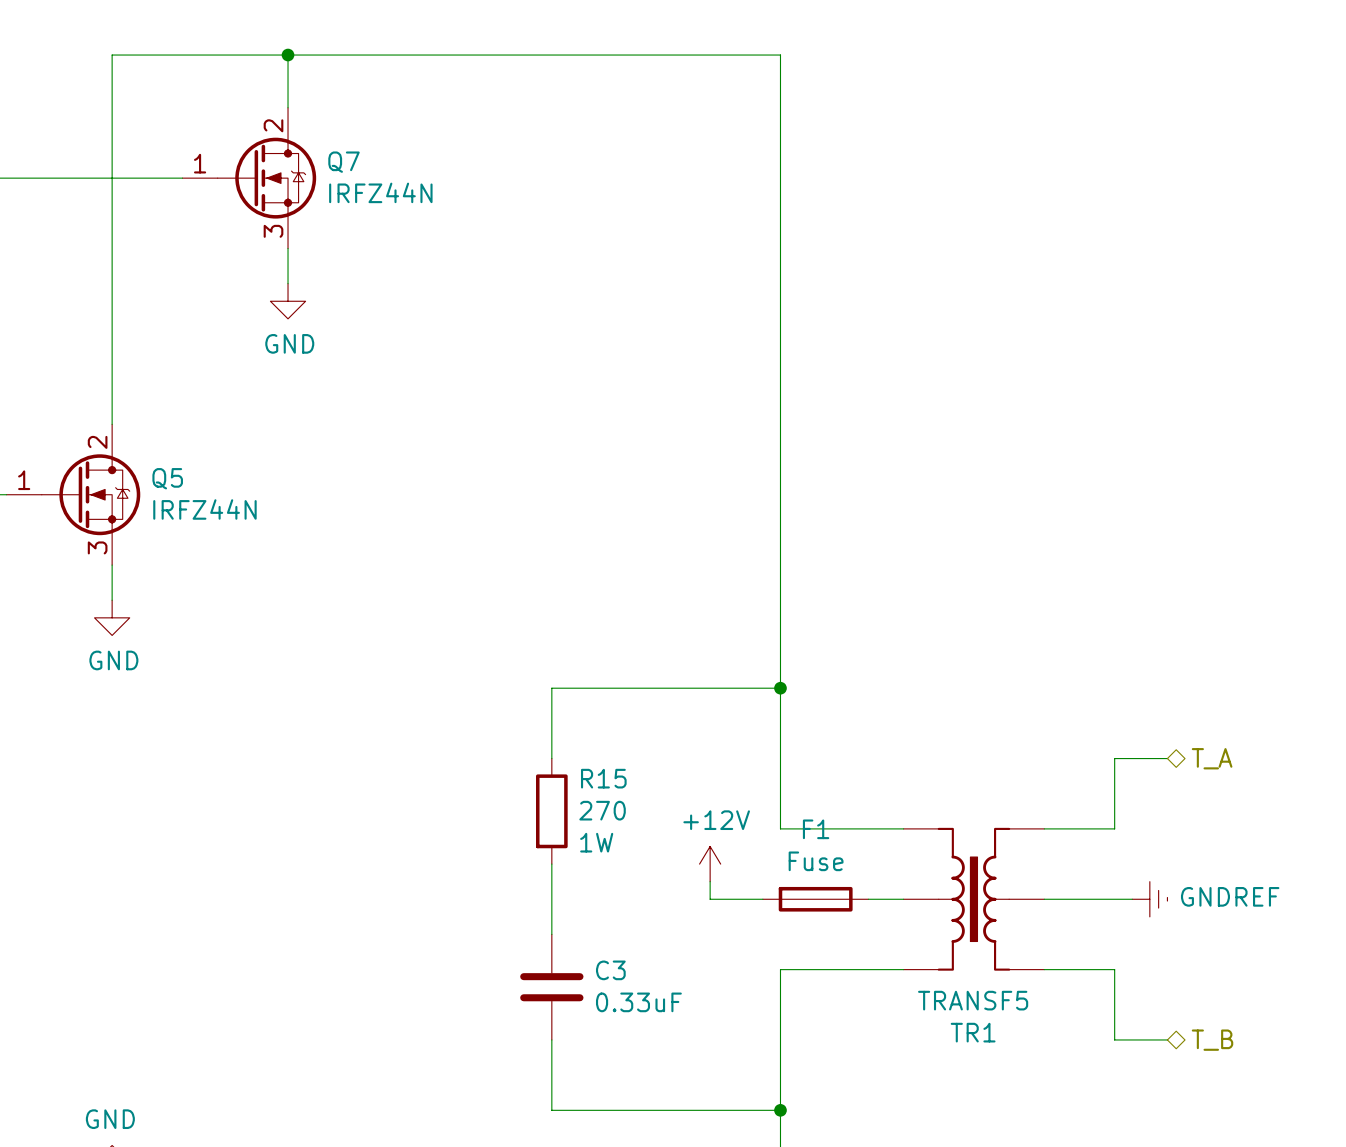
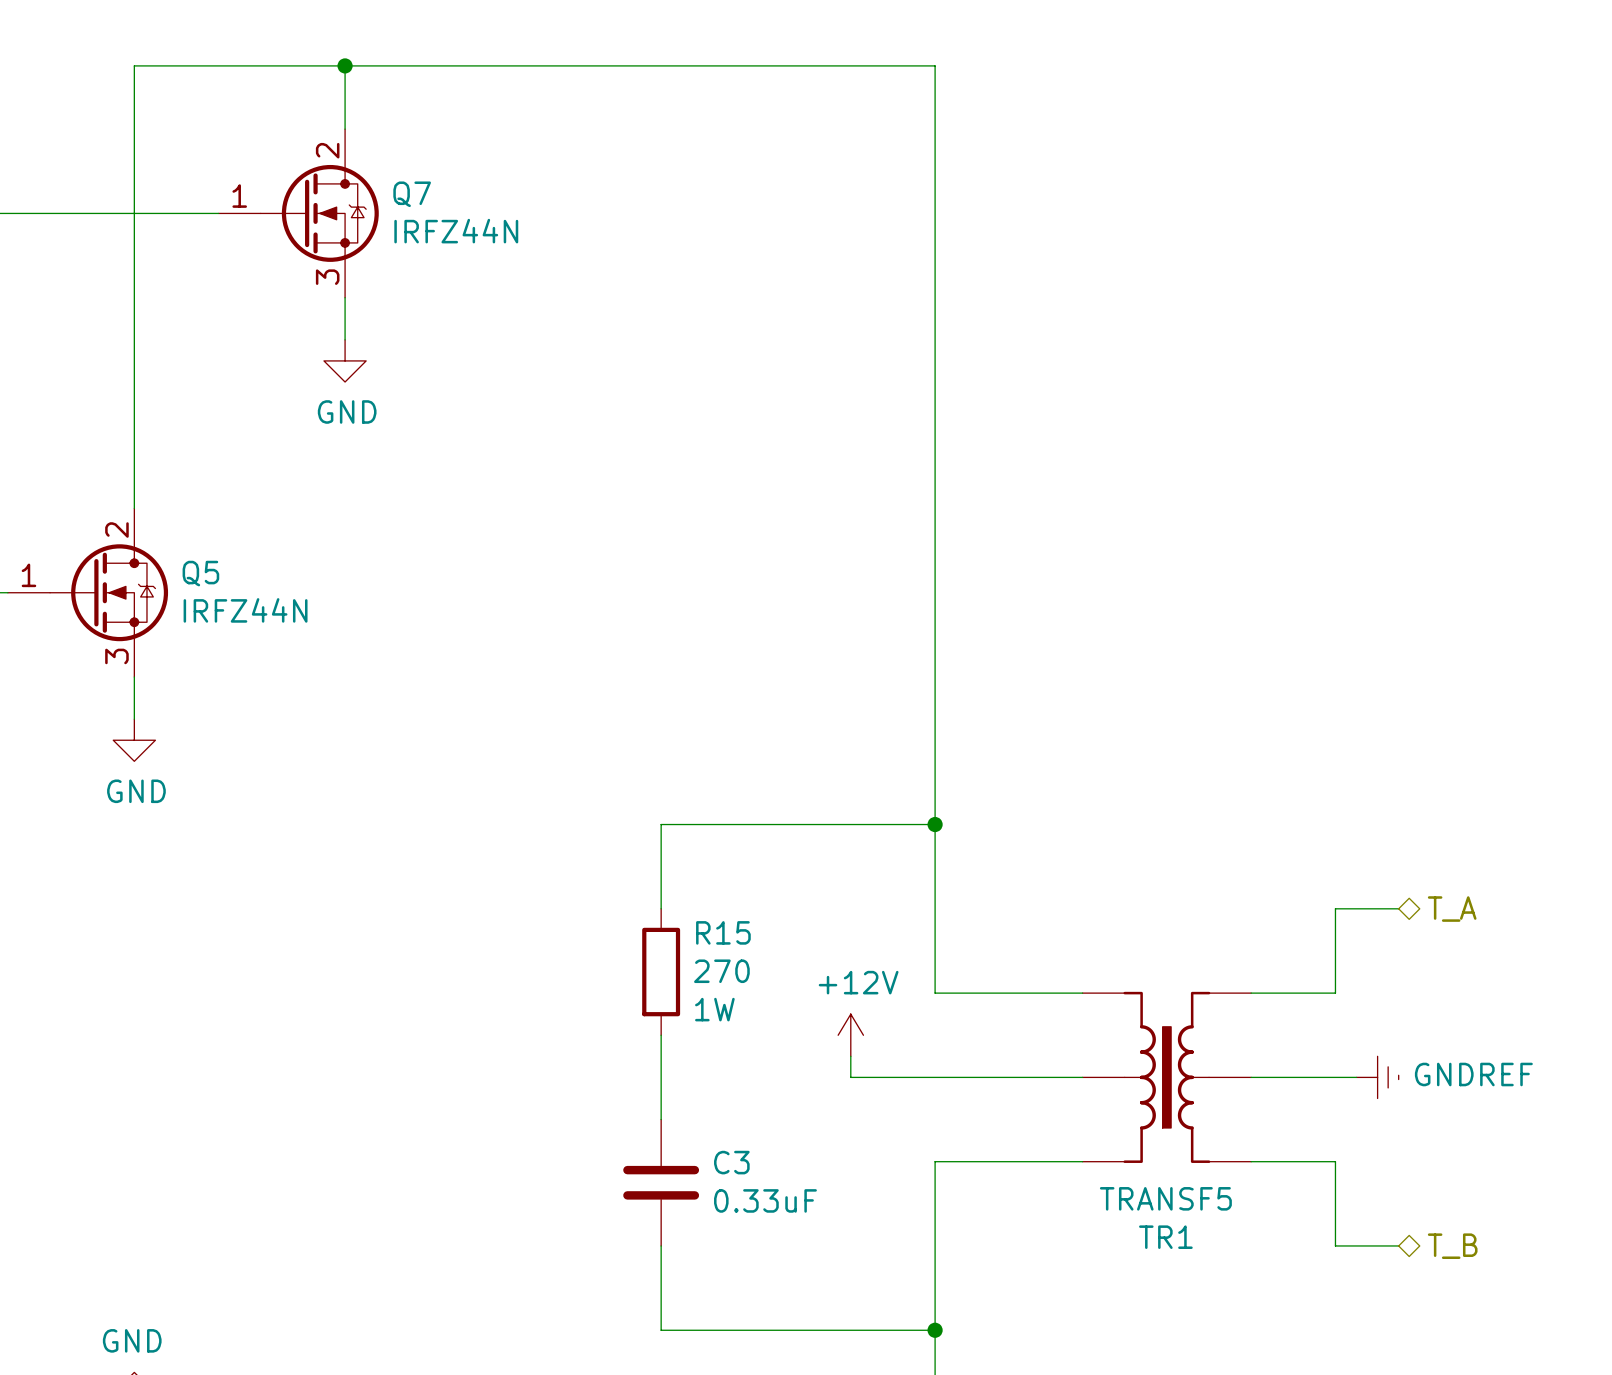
F1: Fuse (815, 899) -> none

